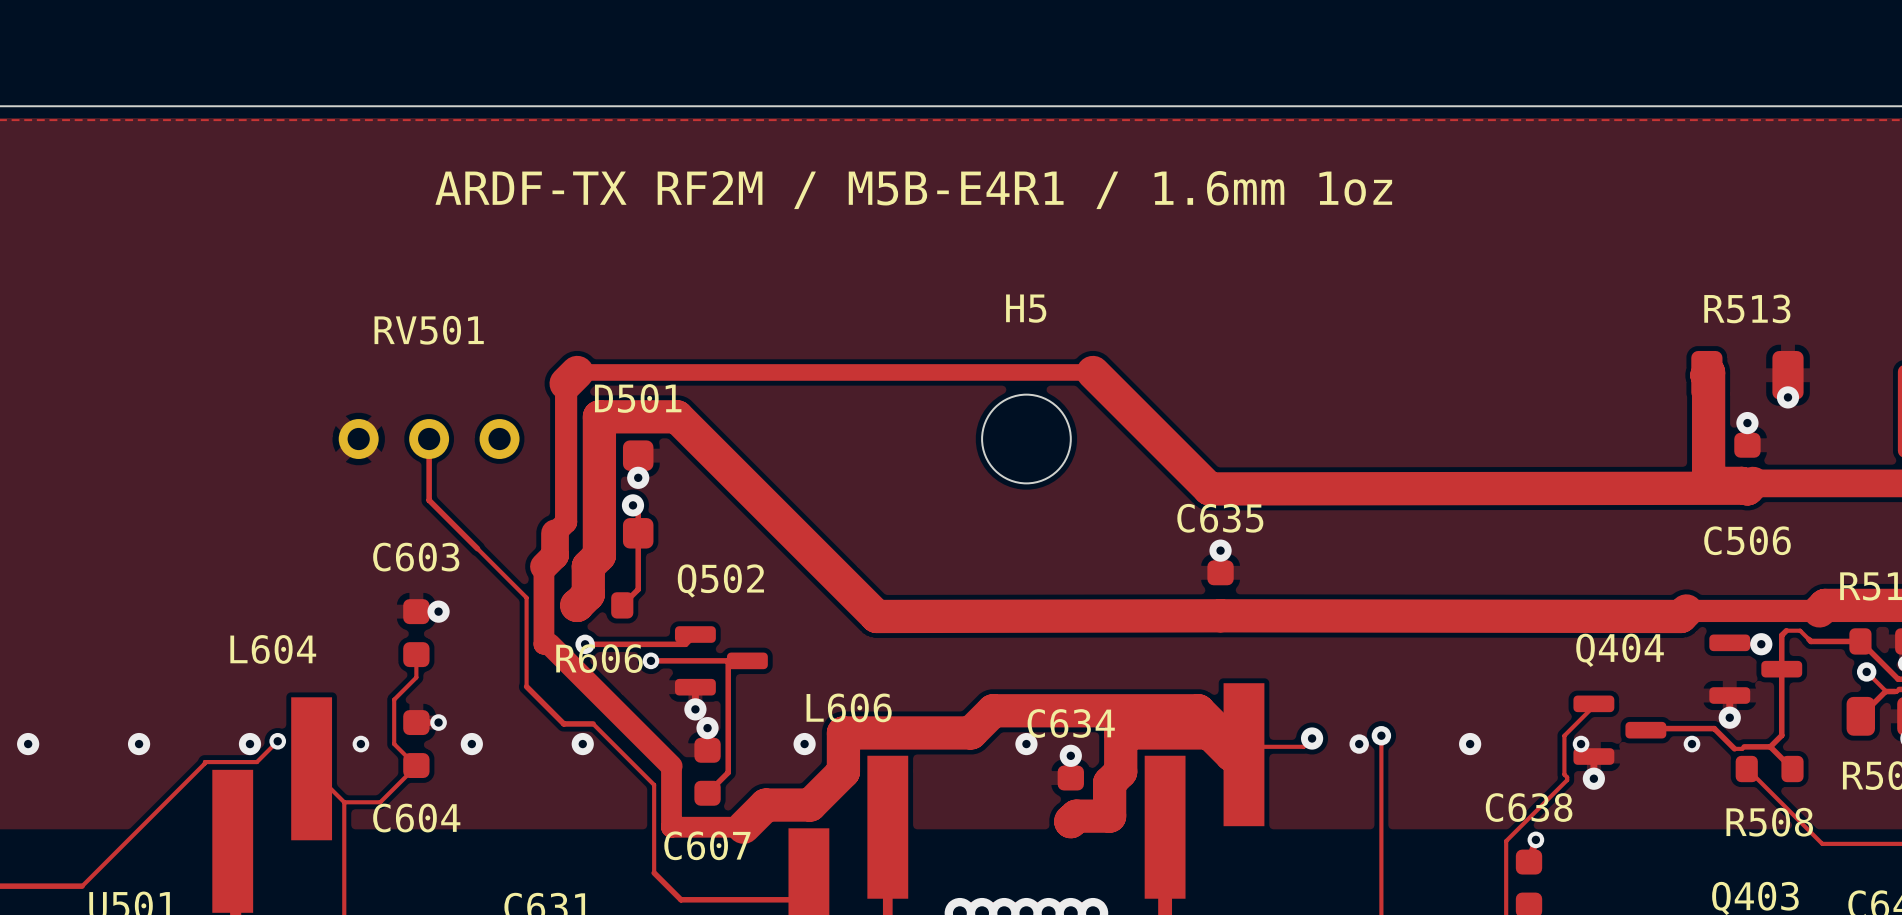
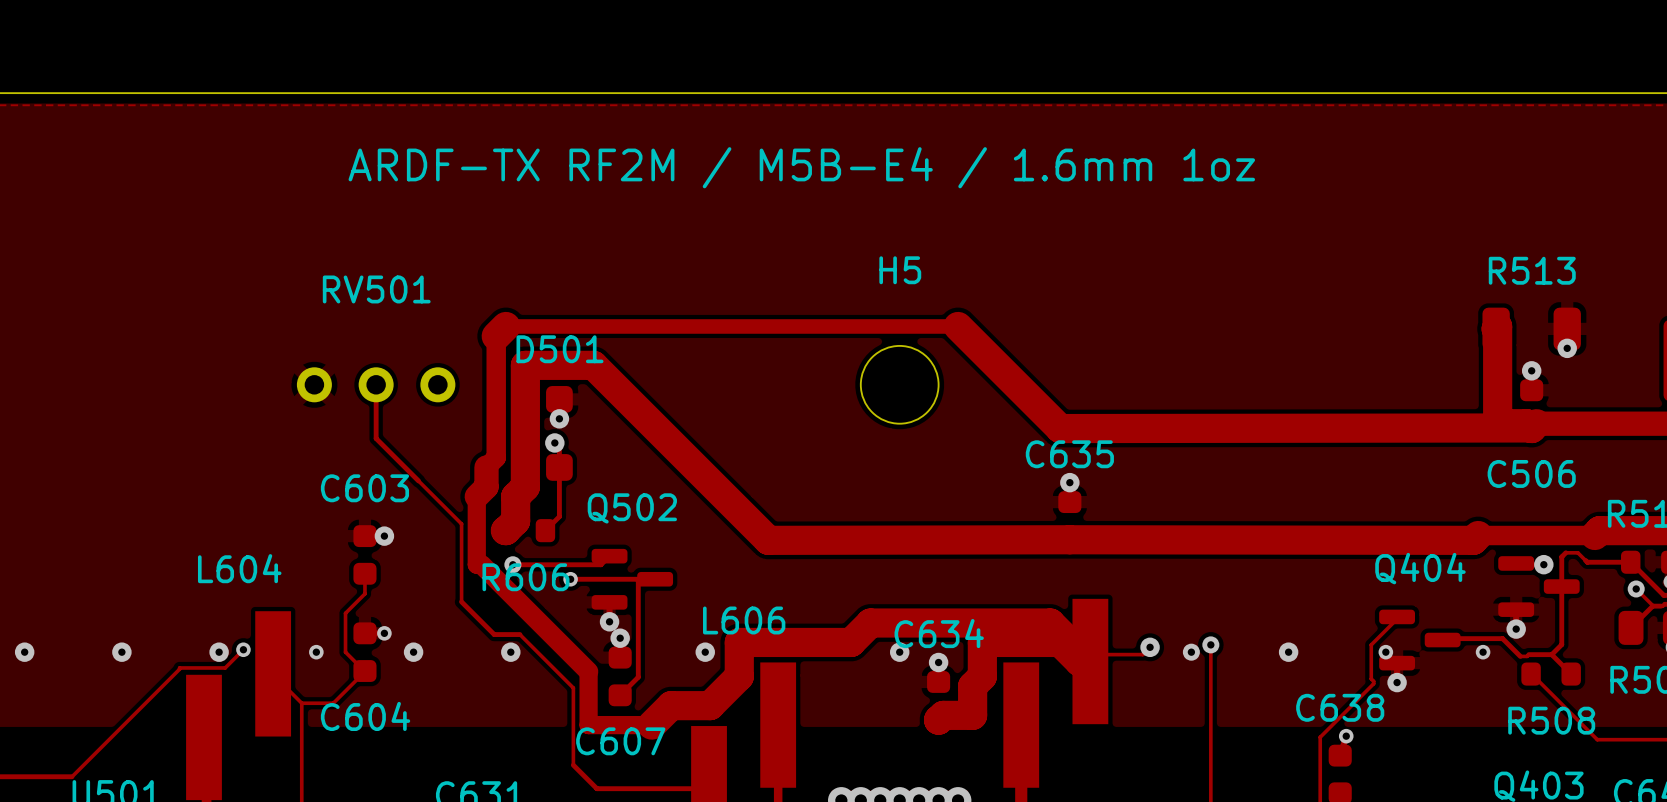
text: ARDF-TX RF2M / M5B-E4R1 / 1.6mm 1oz (913, 190) -> ARDF-TX RF2M / M5B-E4 / 1.6mm 1oz (801, 167)

